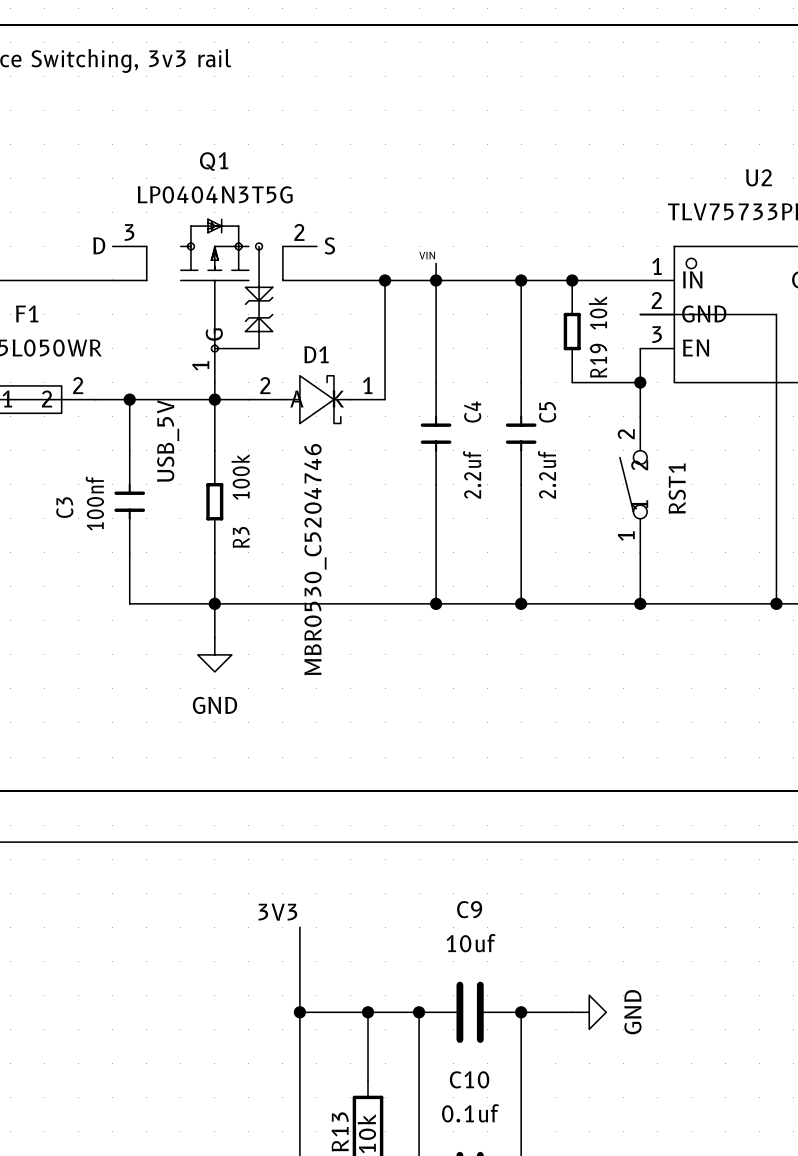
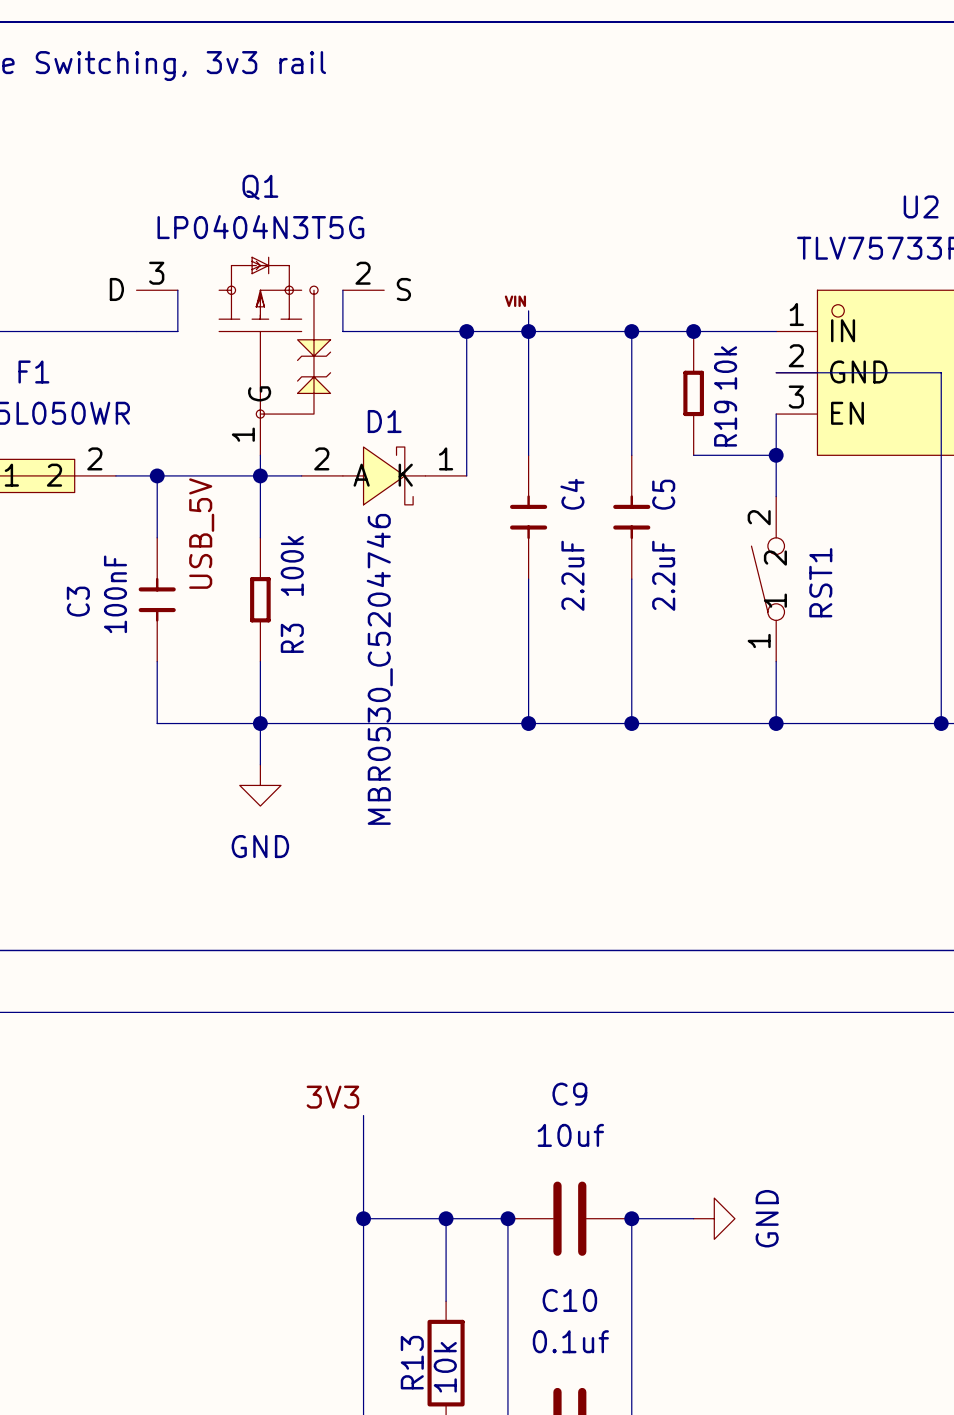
C4 value: 2.2uf (472, 474) -> 2.2uF (572, 575)
C5 value: 2.2uf (547, 474) -> 2.2uF (663, 575)
C3 value: 100nf (94, 503) -> 100nF (115, 594)

